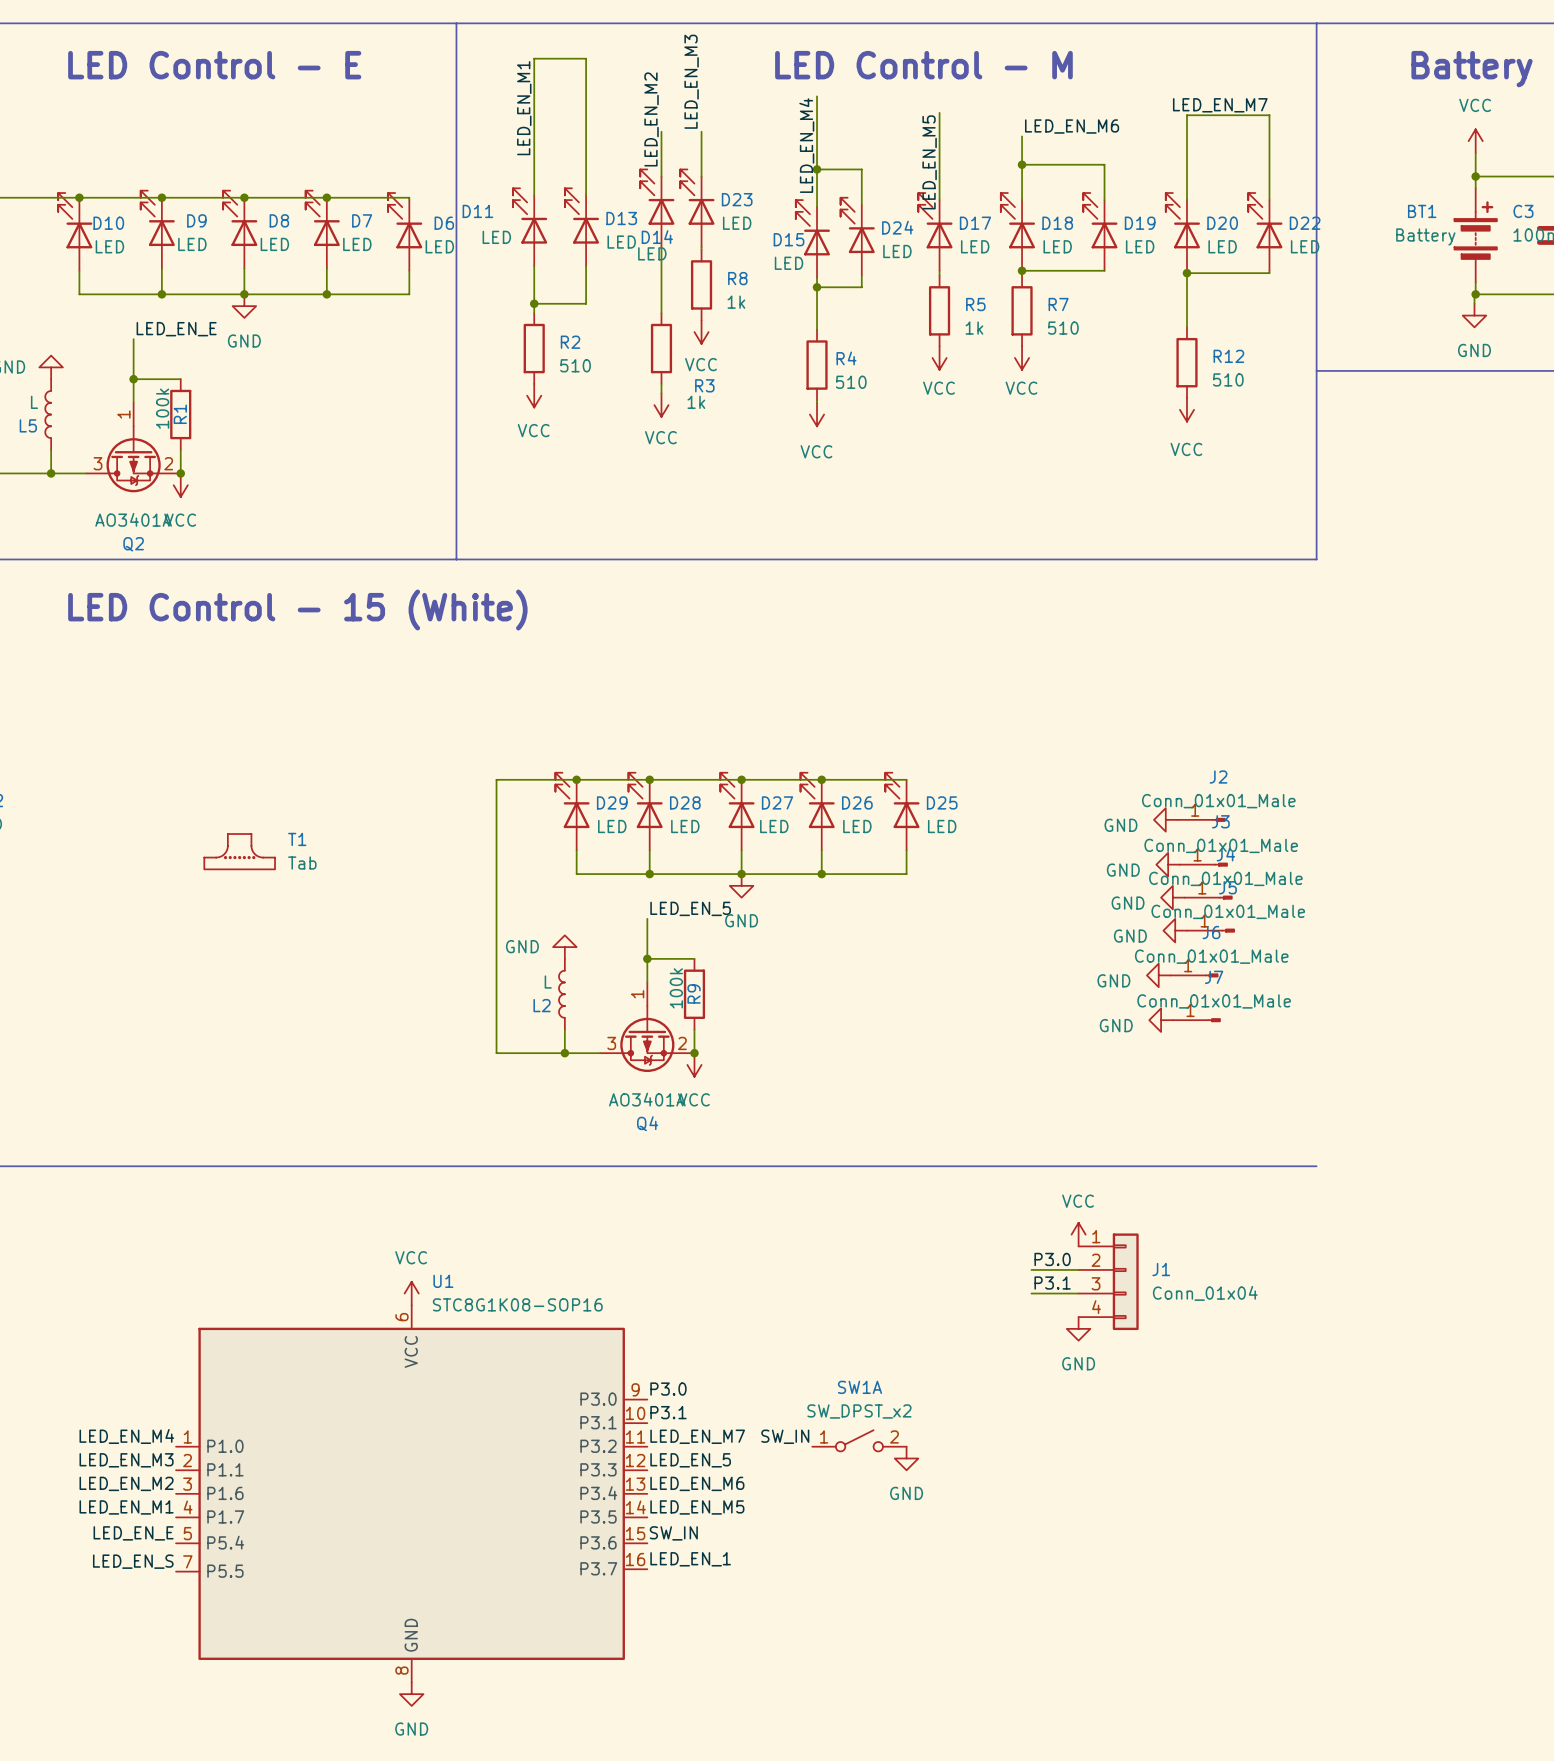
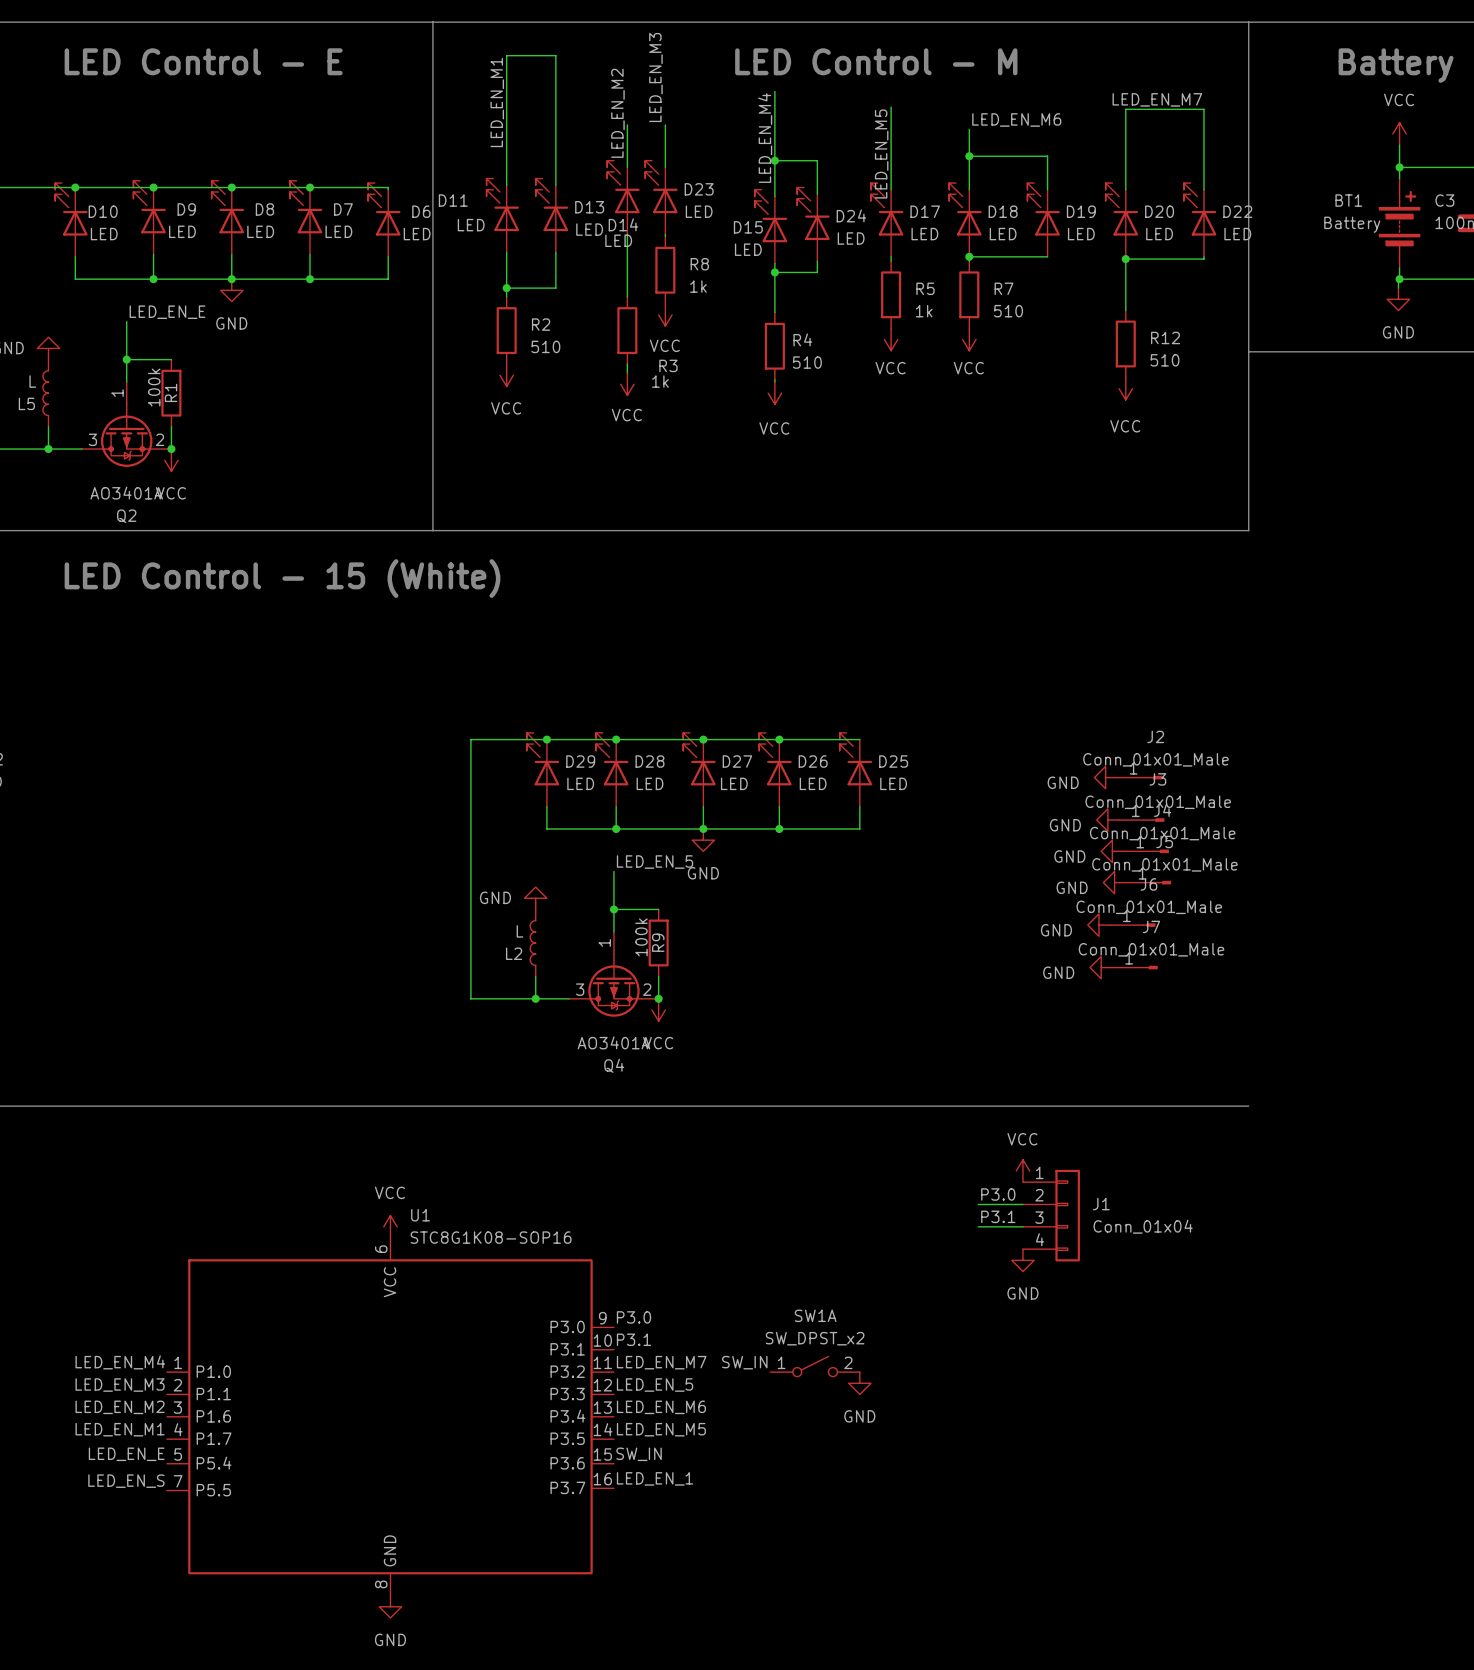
T1: Tab (239, 851) -> none

